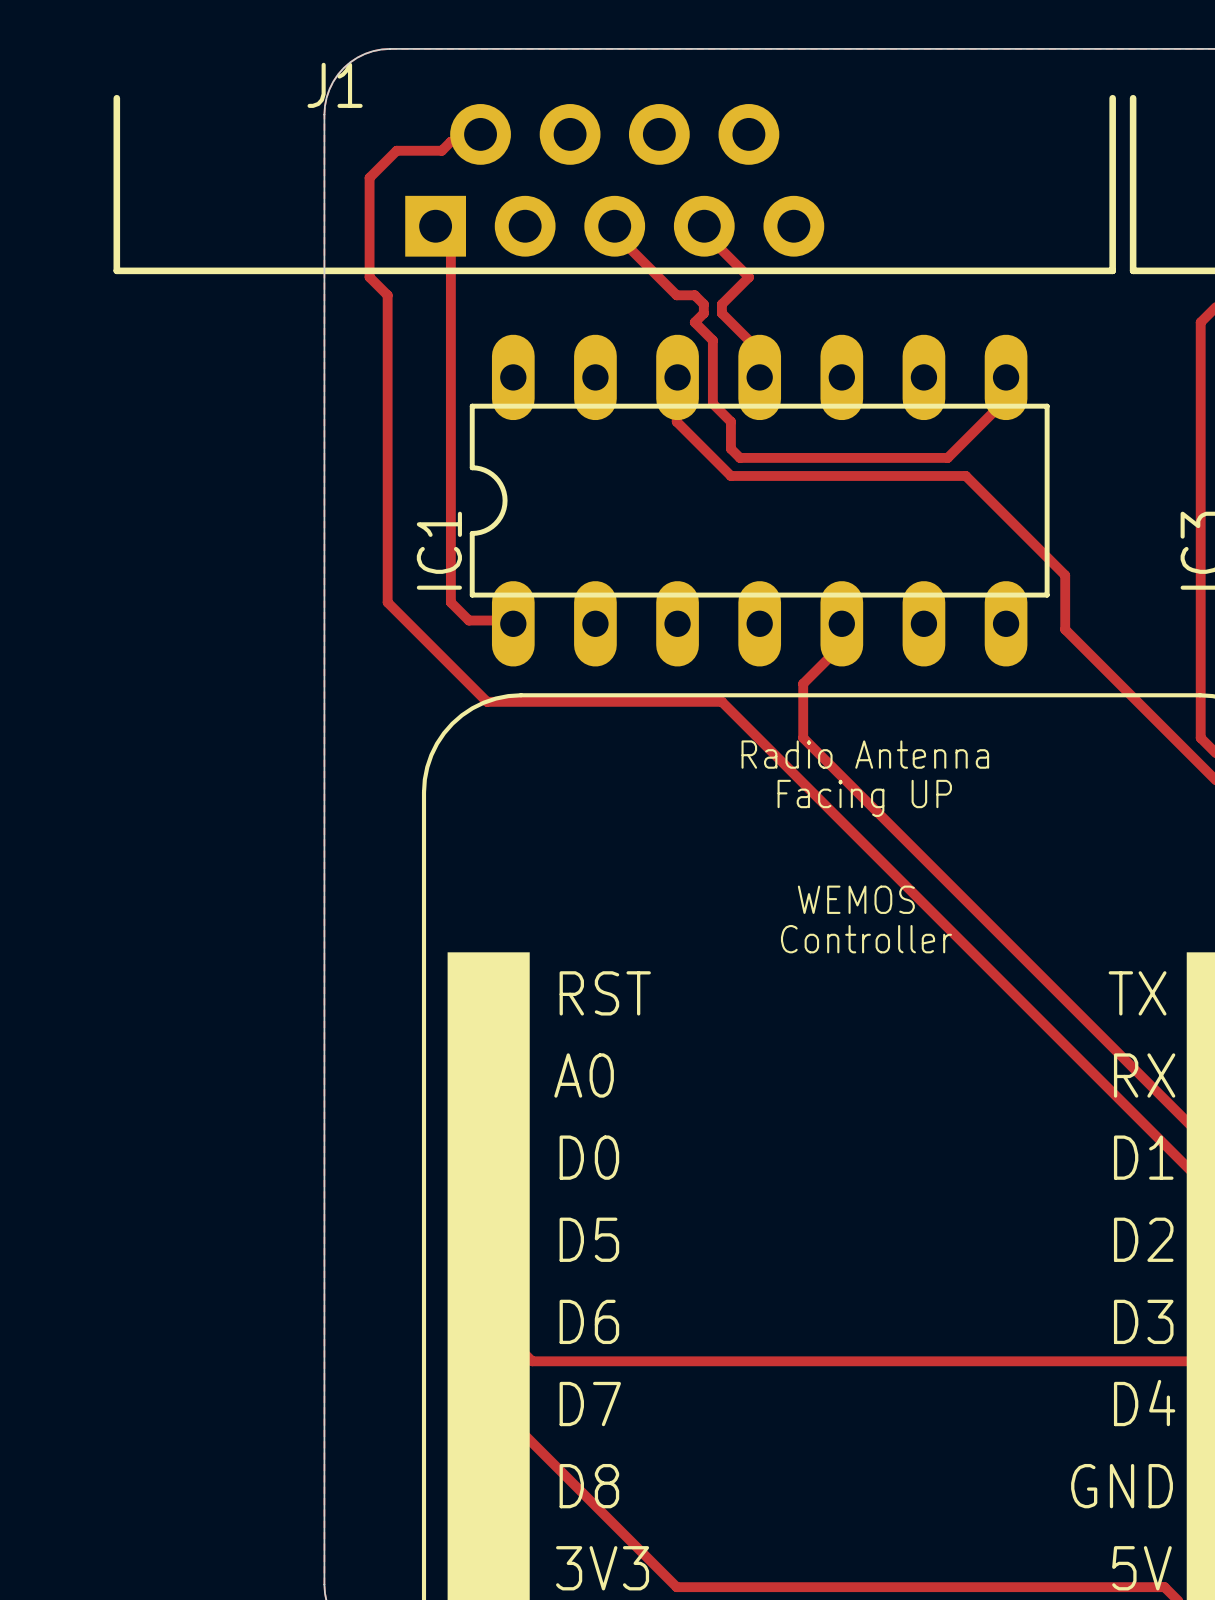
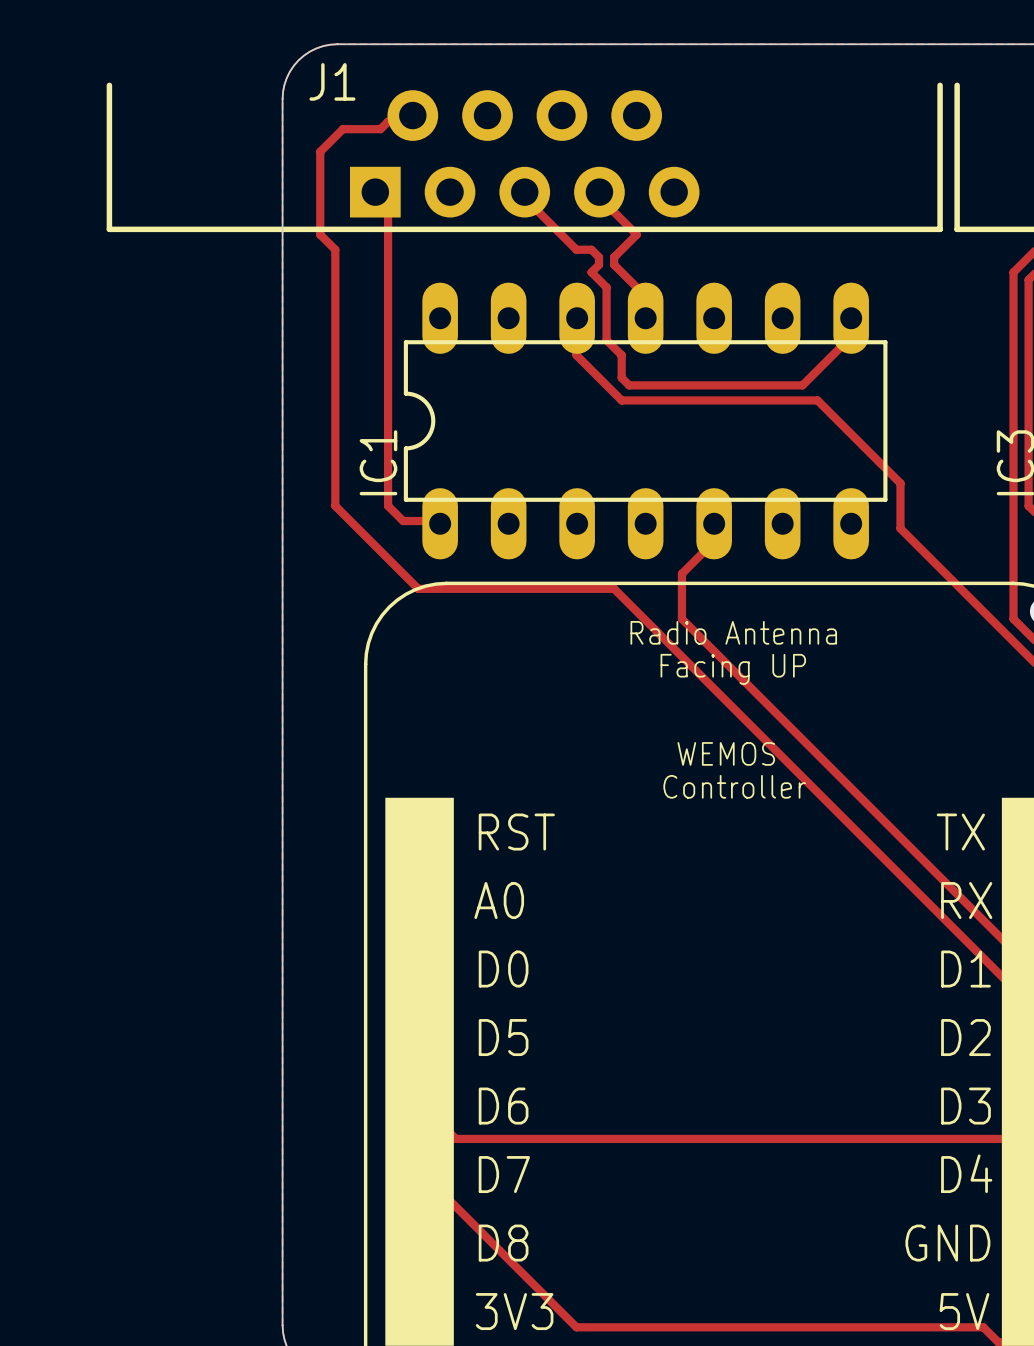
J1 name position: J1 (335, 85) -> J1 (332, 81)

